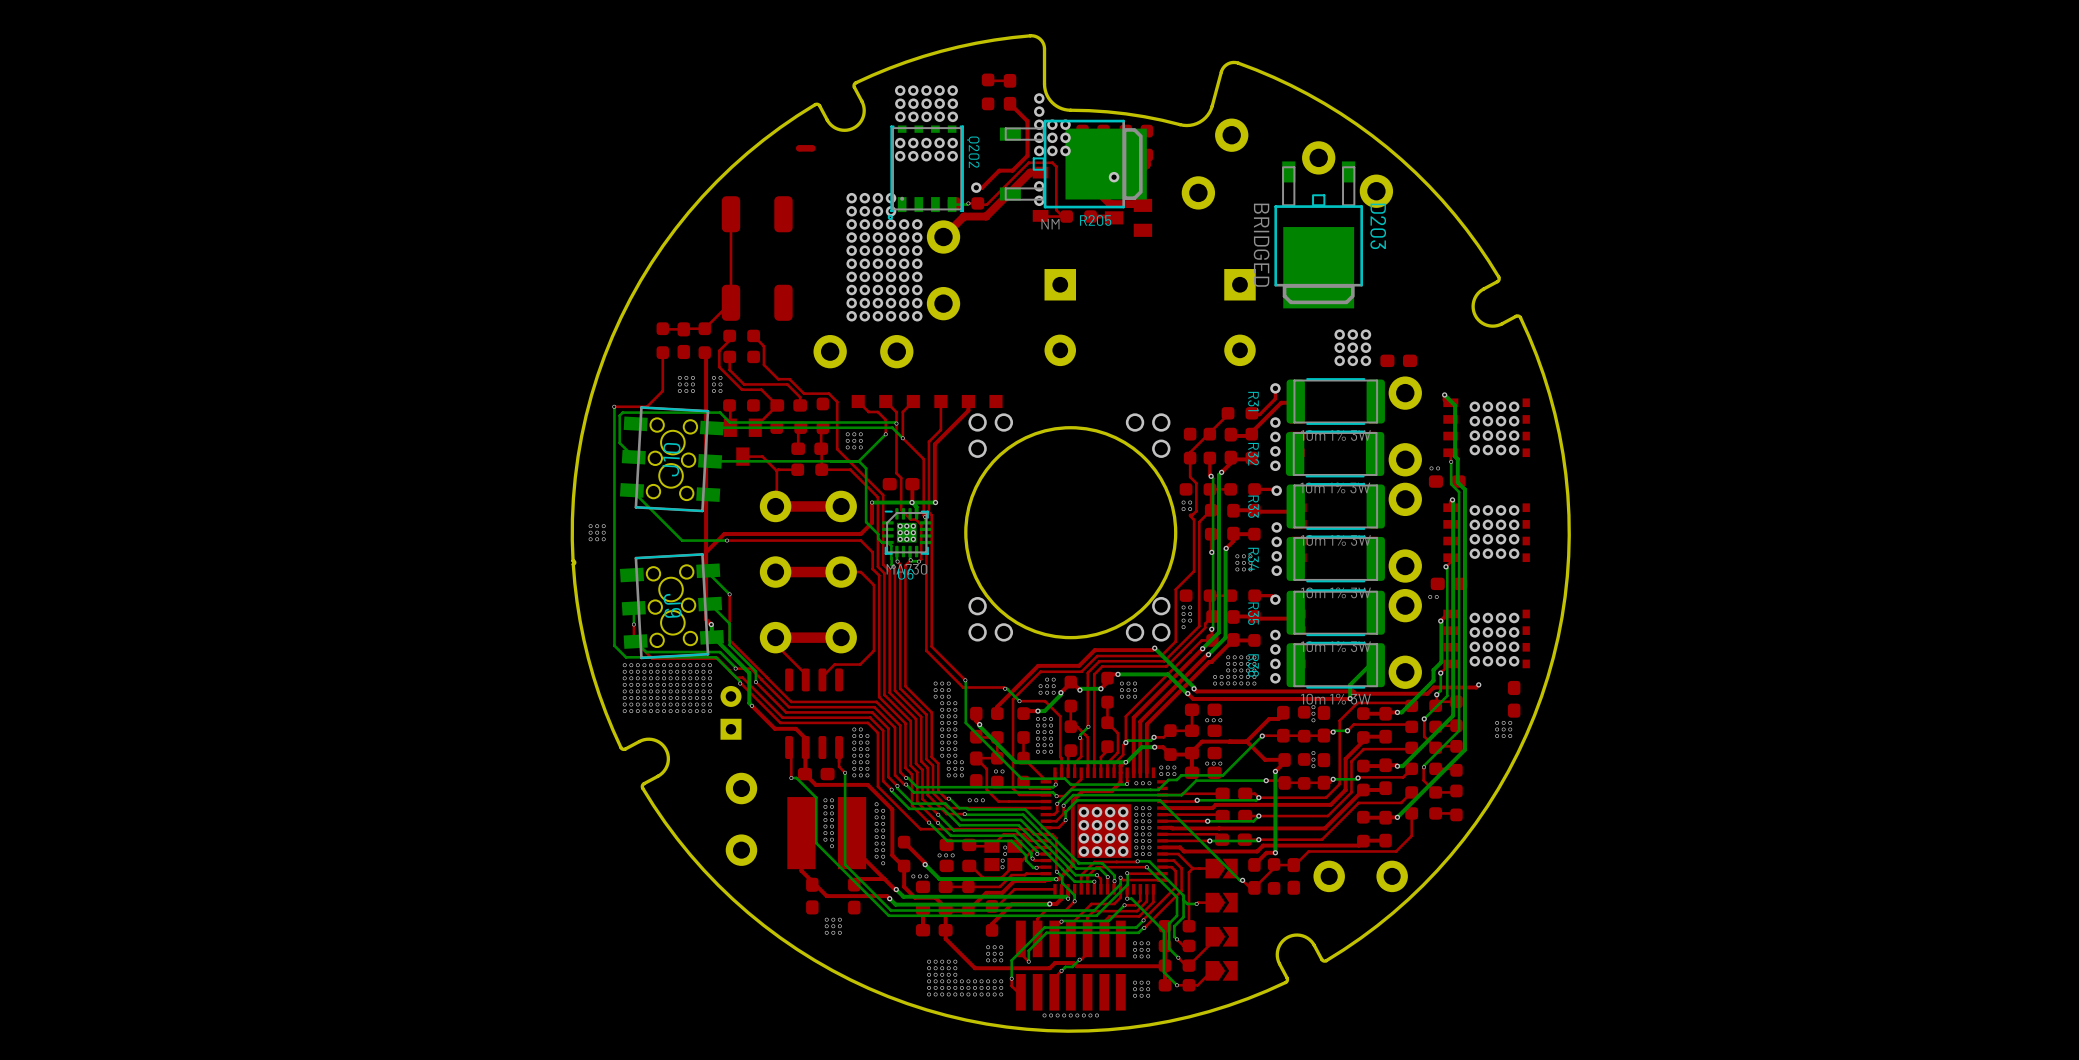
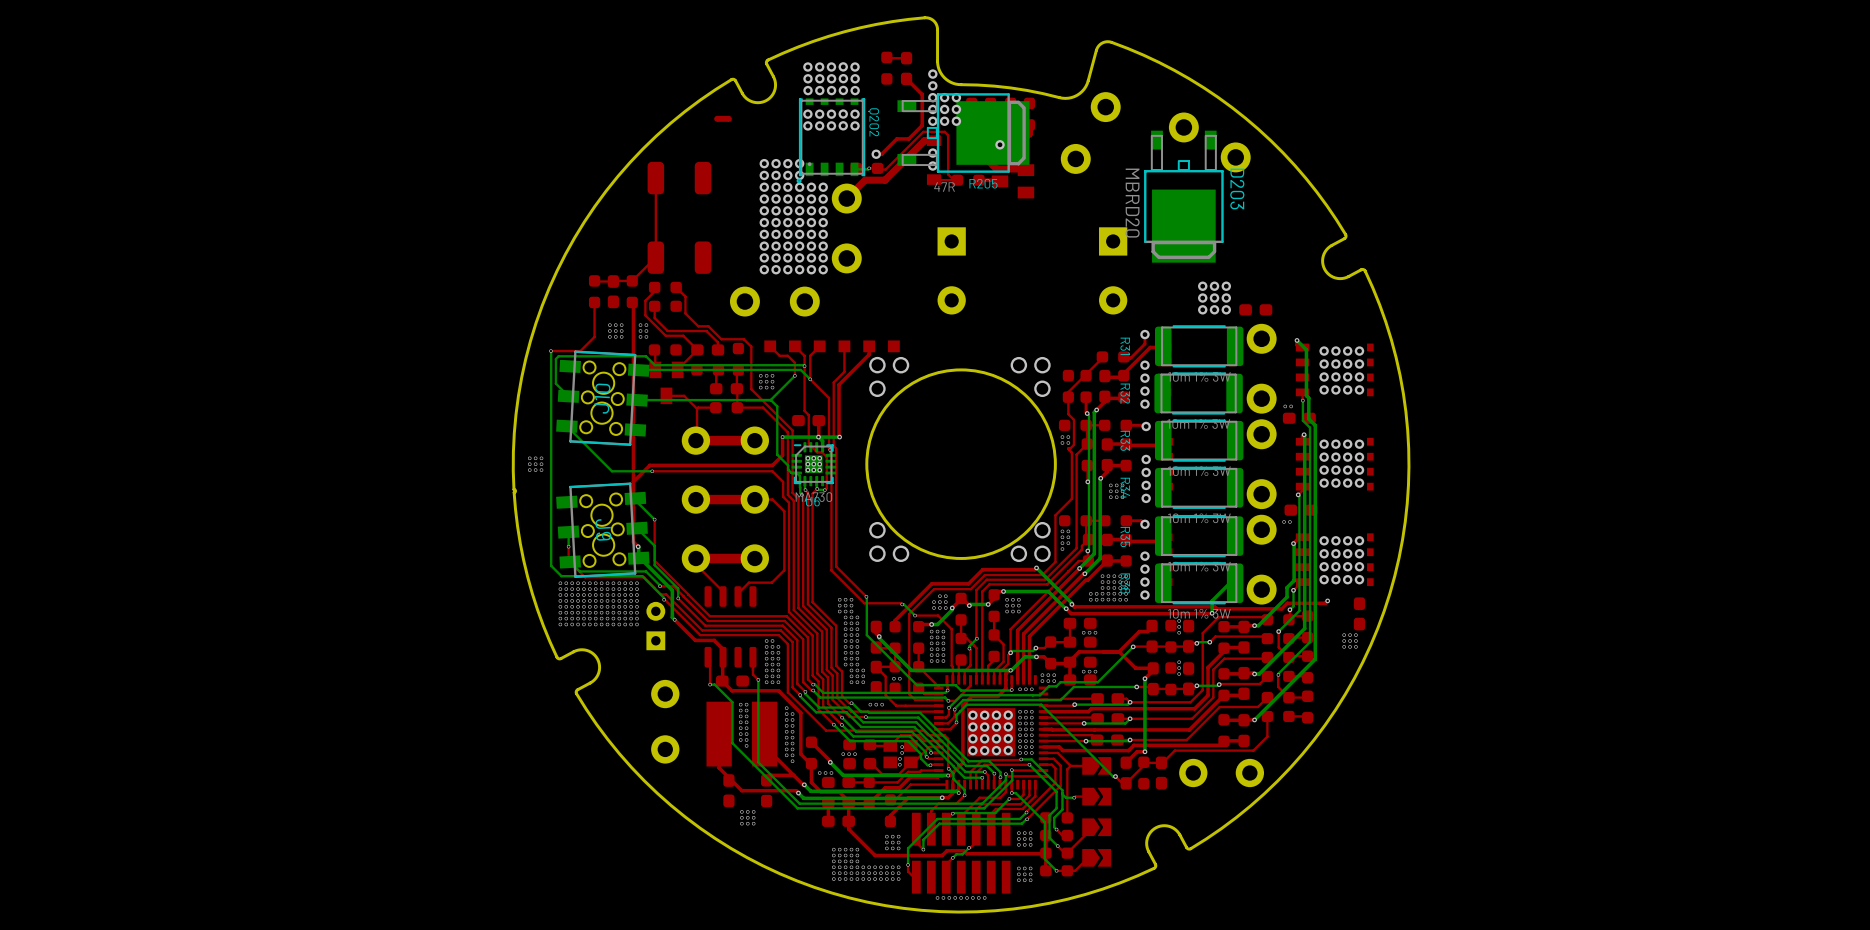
R205 value: NM (1050, 224) -> 47R (944, 187)
D203 value: BRIDGED (1261, 245) -> MBRD20 (1132, 203)

